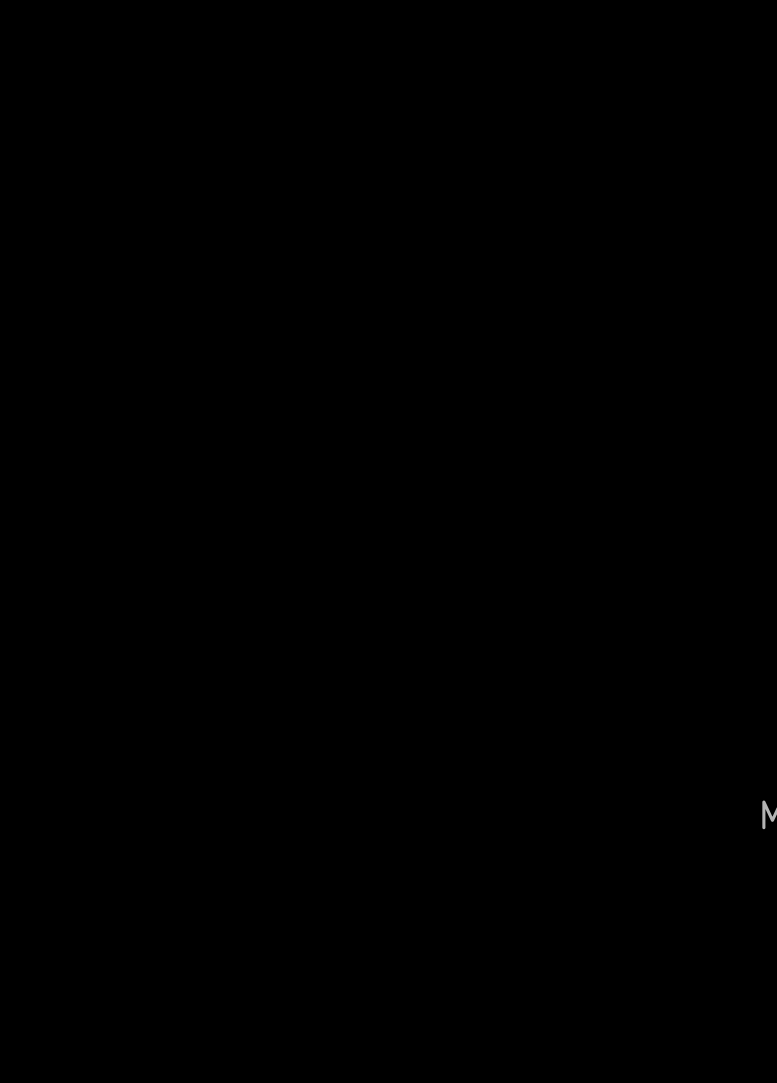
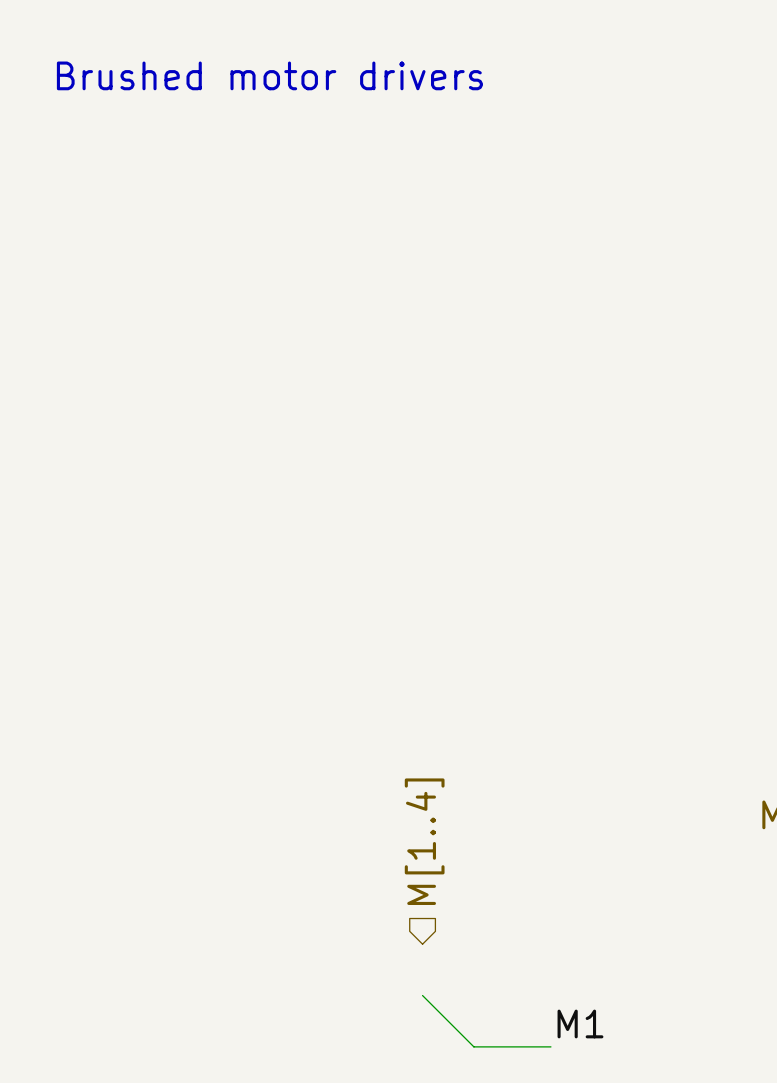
text: none -> Brushed motor drivers (269, 75)
hierarchical label: none -> M[1..4] (424, 841)
wire: none -> (422, 995) (473, 1046) (550, 1046)
label: none -> M1 (580, 1023)

